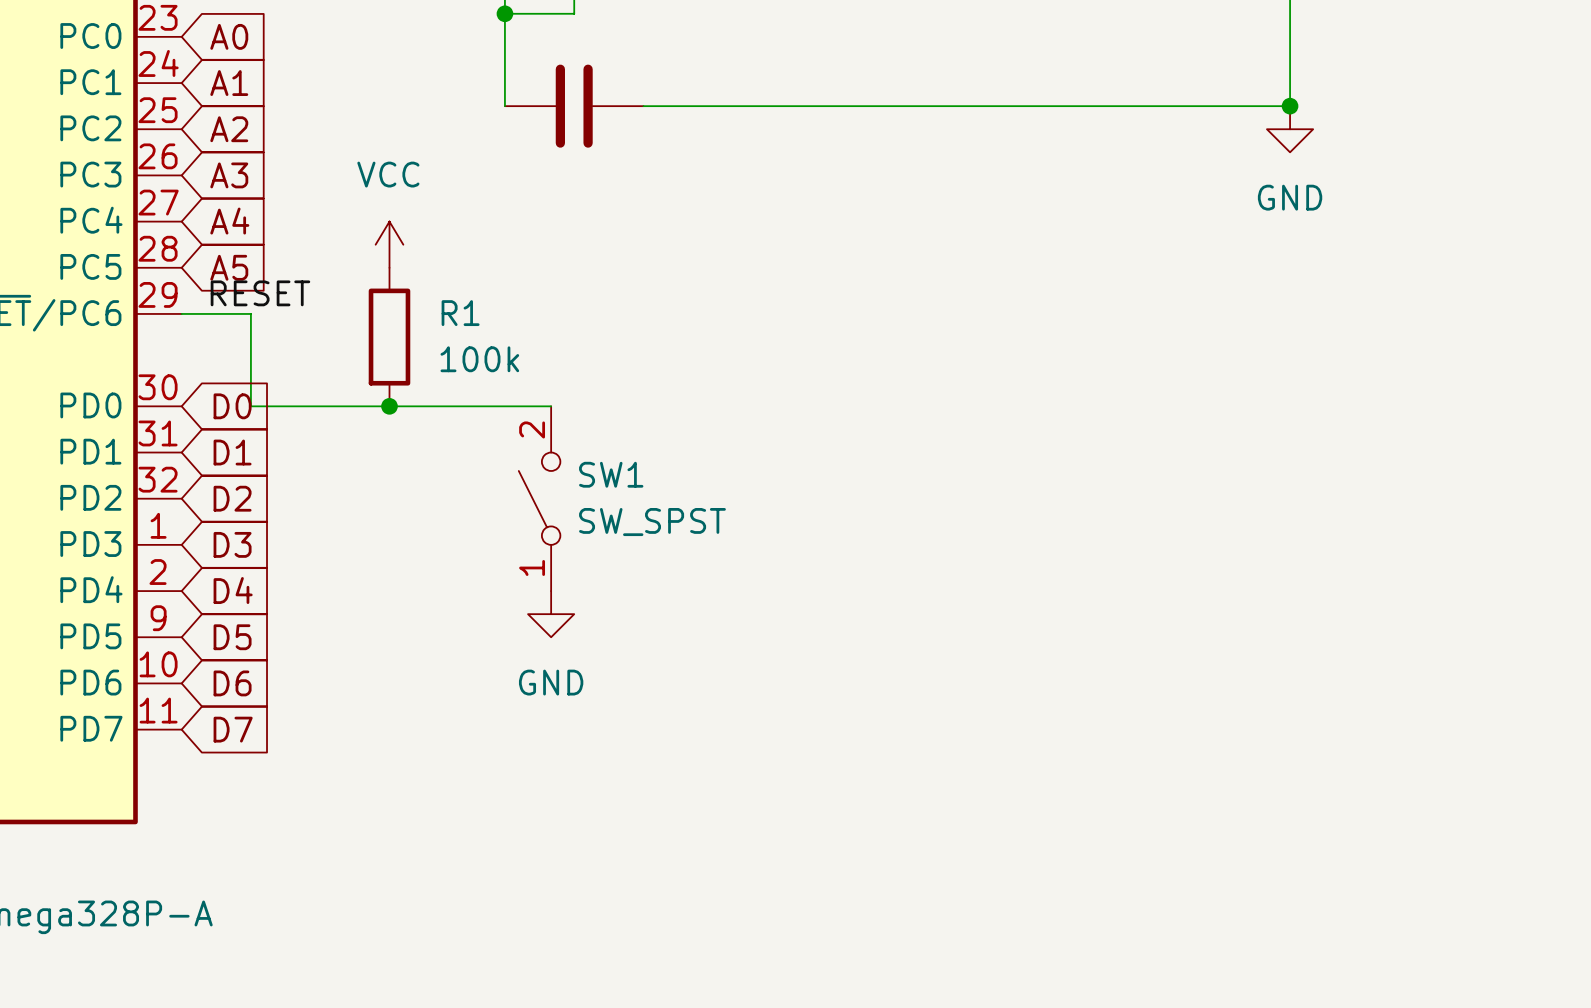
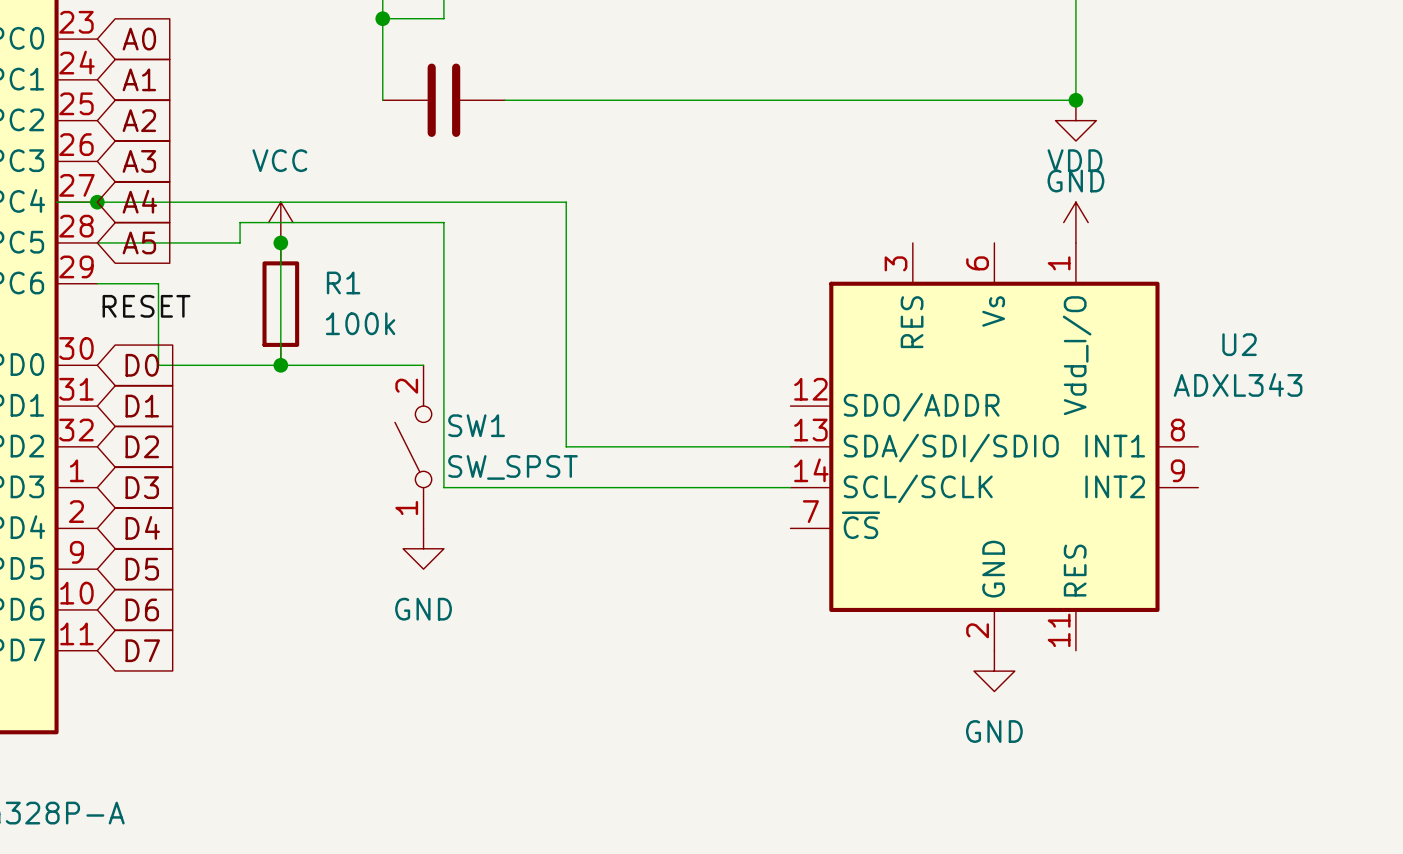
wire: none -> (56, 202) (566, 202) (566, 446) (790, 446)
junction: none -> (97, 202)
power symbol: none -> VDD (1075, 222)
wire: none -> (97, 242) (240, 242) (240, 222) (443, 222) (443, 487) (790, 487)
wire: none -> (280, 242) (280, 365)
junction: none -> (280, 242)
label position: RESET (260, 293) -> RESET (146, 306)
U2: none -> ADXL343 (994, 446)
power symbol: none -> GND (994, 671)

